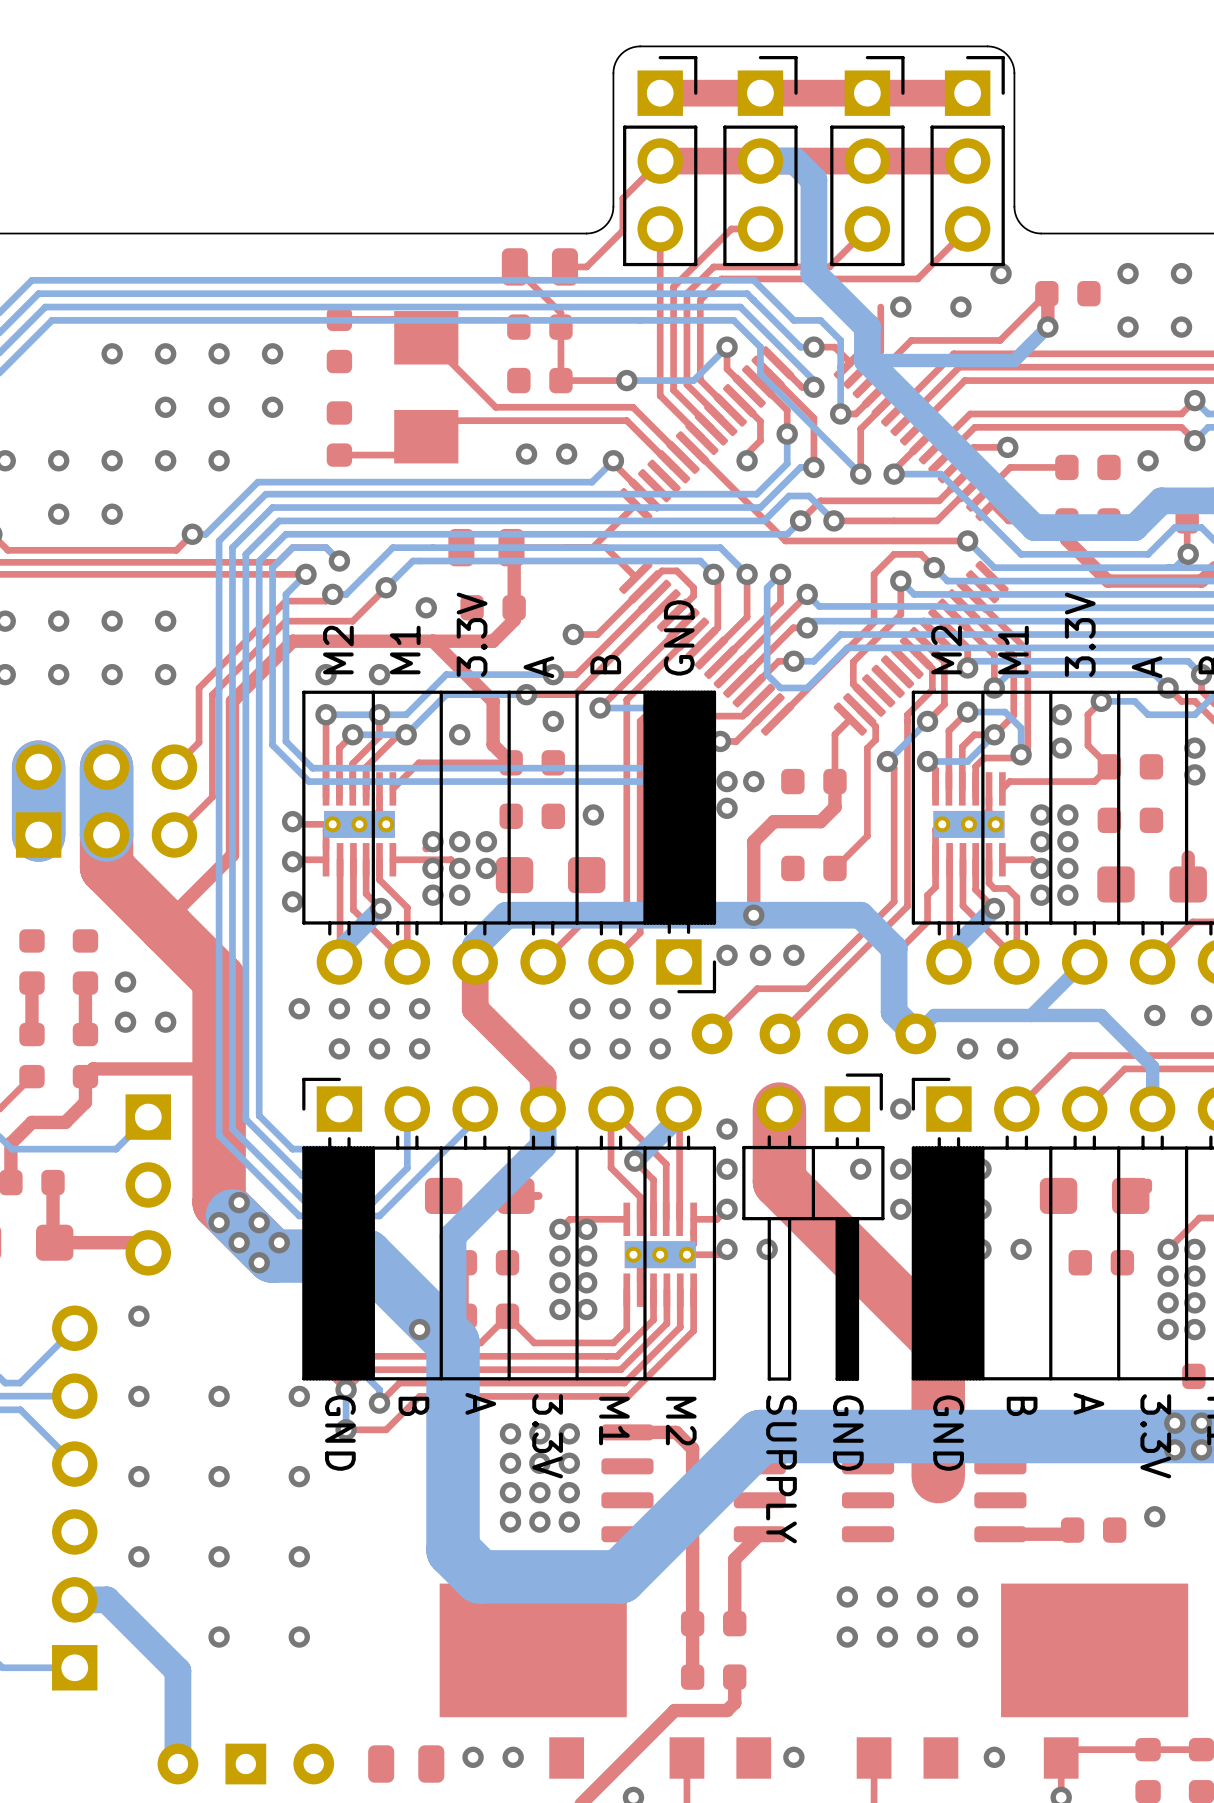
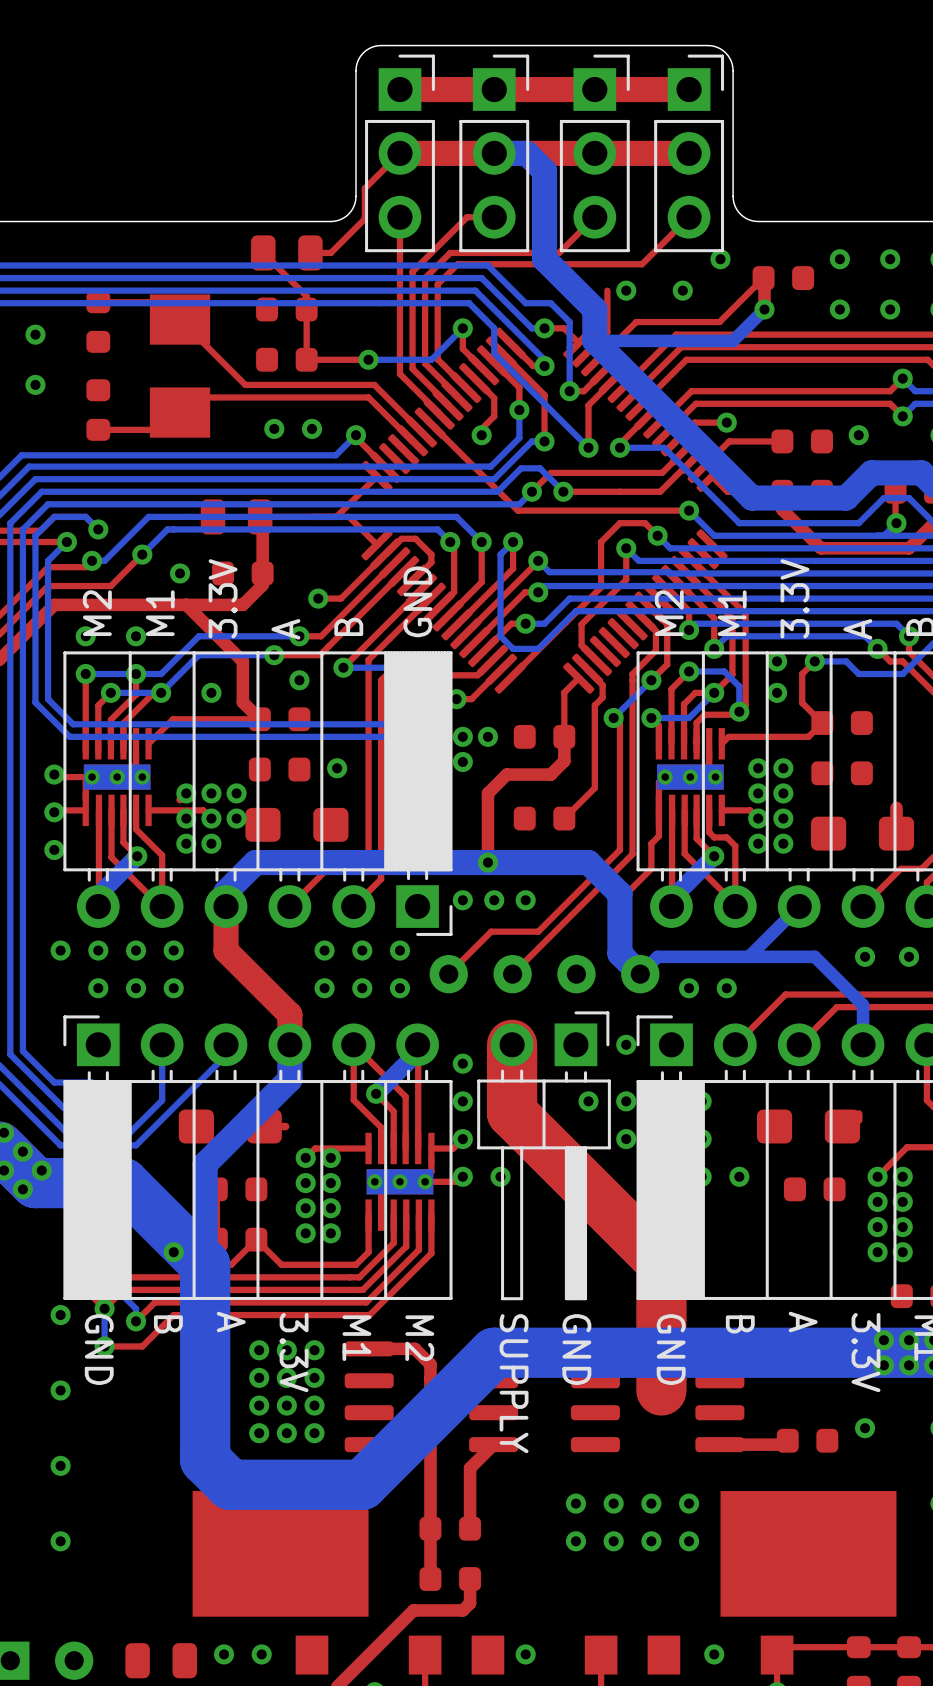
via: none -> (777, 661)
via: (1061, 714) -> none
via: none -> (777, 692)
via: (1061, 748) -> none
via: (1194, 748) -> none
via: (1194, 774) -> none

